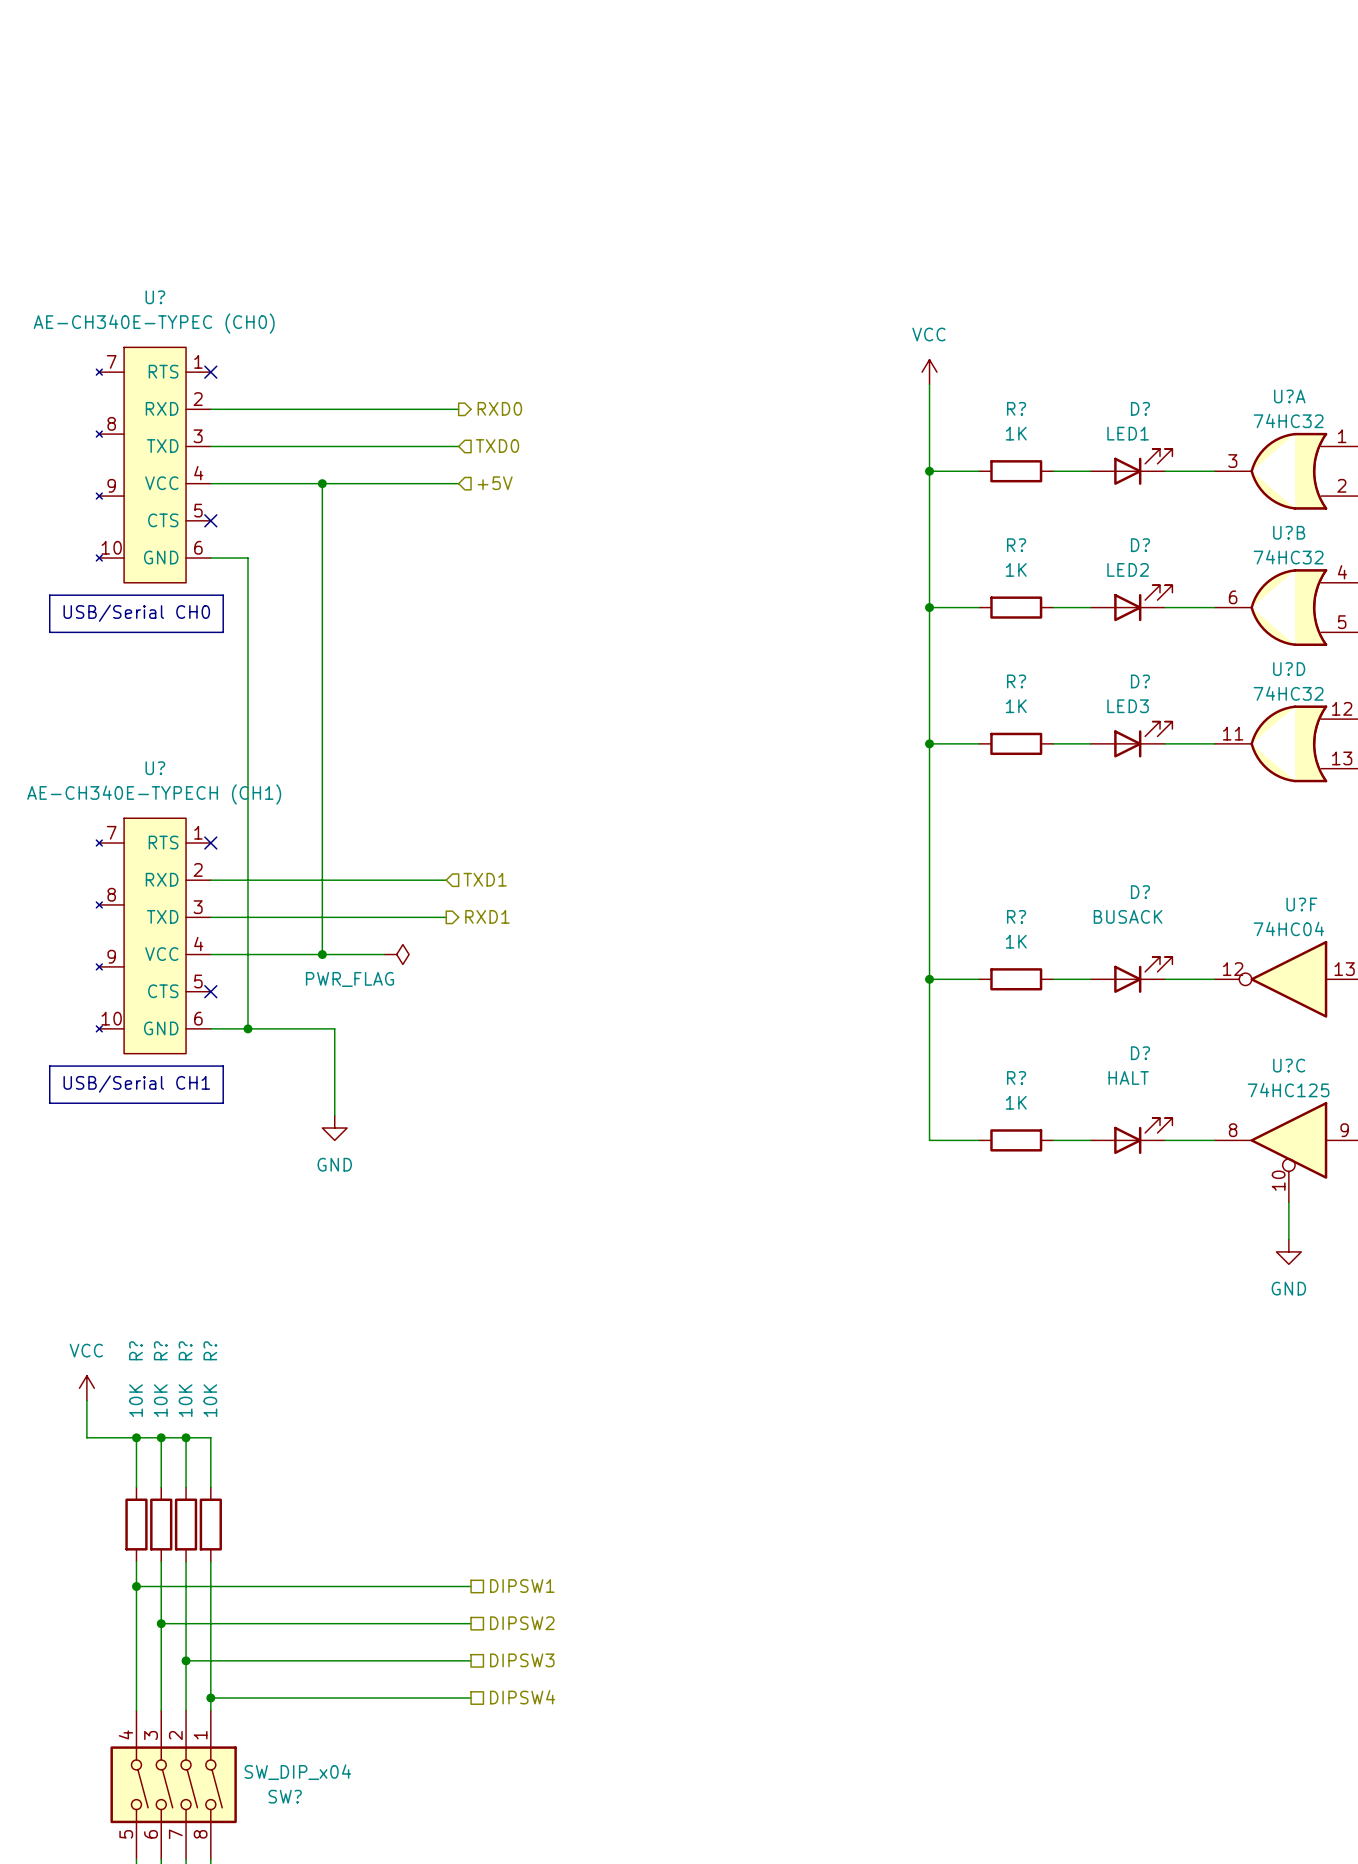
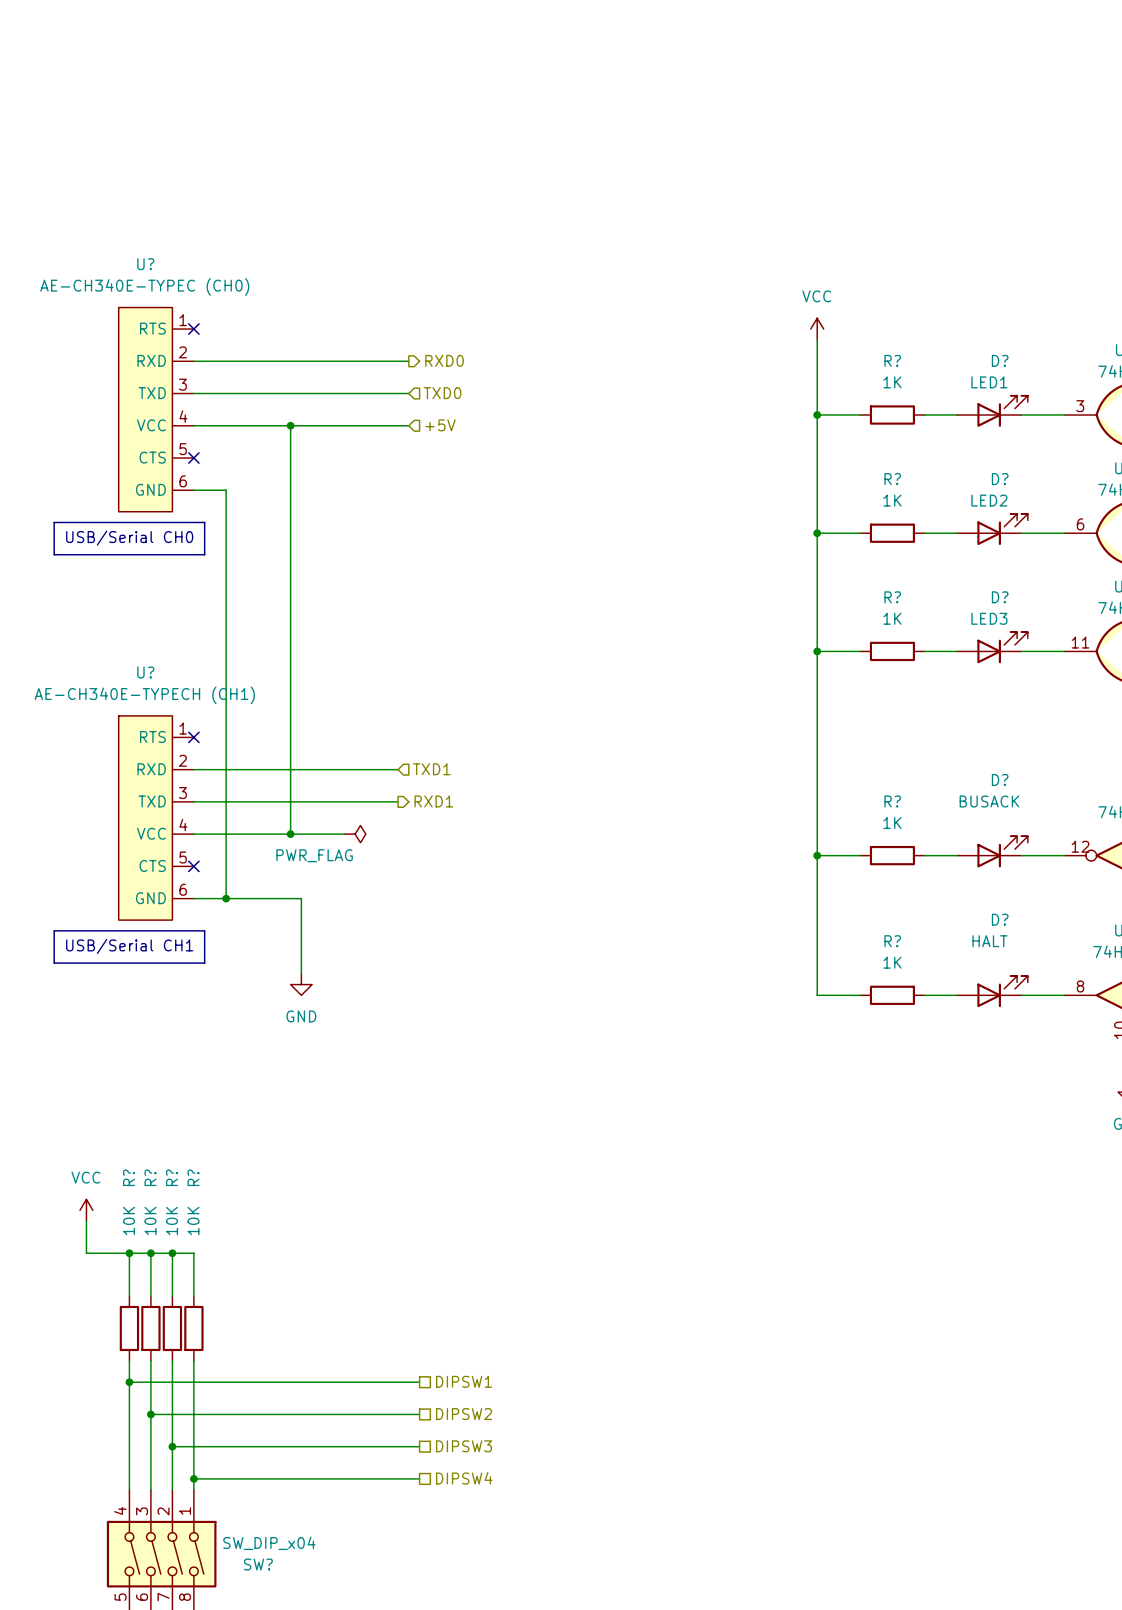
U?: AE-CH340E-TYPEC (CH0) (153, 465) -> none
U?: none -> AE-CH340E-TYPEC (CH0) (156, 409)
U?: AE-CH340E-TYPECH (CH1) (153, 935) -> none
U?: none -> AE-CH340E-TYPECH (CH1) (156, 818)

